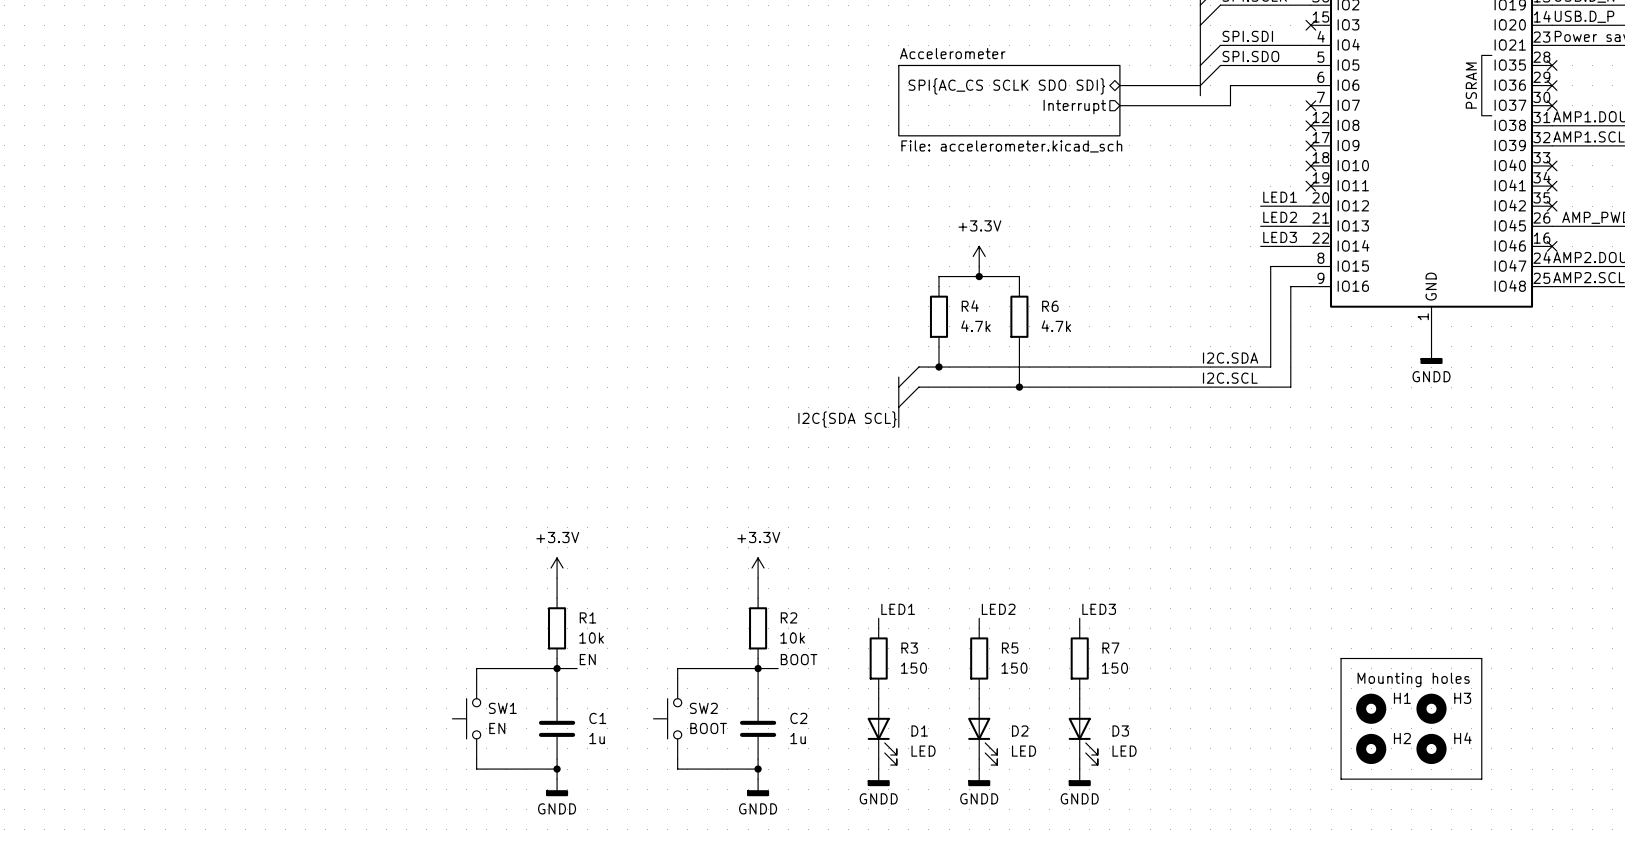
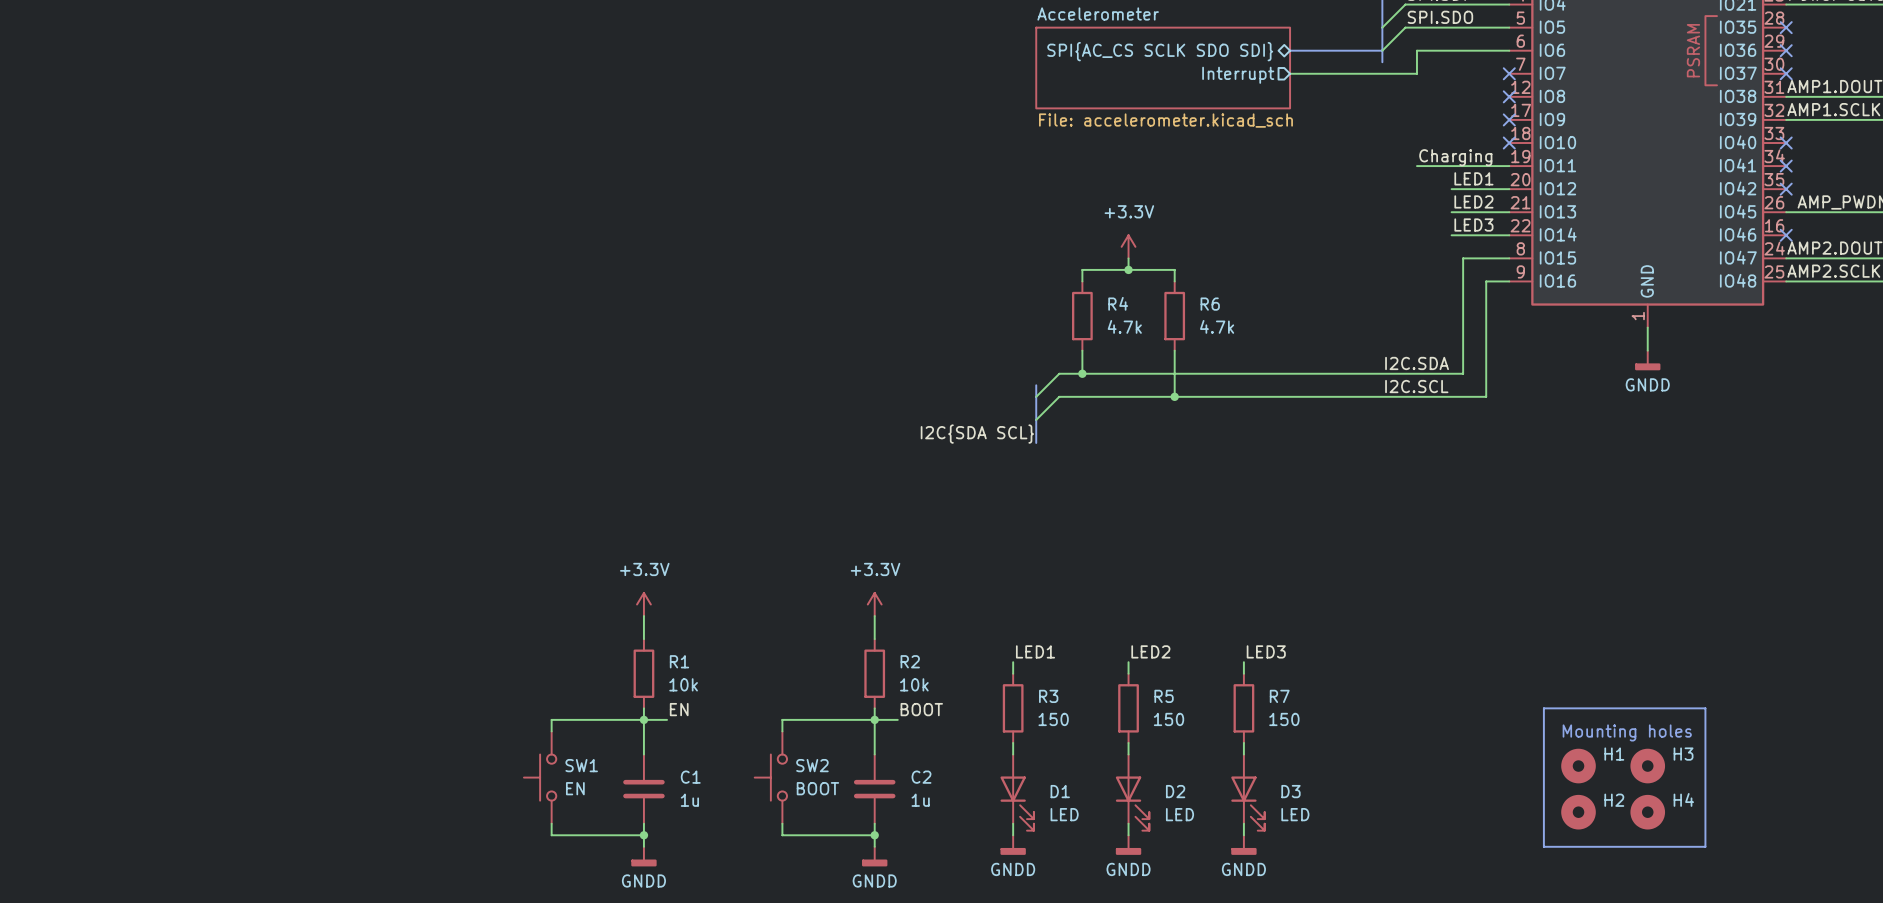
label: none -> Charging (1455, 157)
wire: none -> (1416, 166) (1509, 166)
no-connect mark: (1310, 186) -> none

